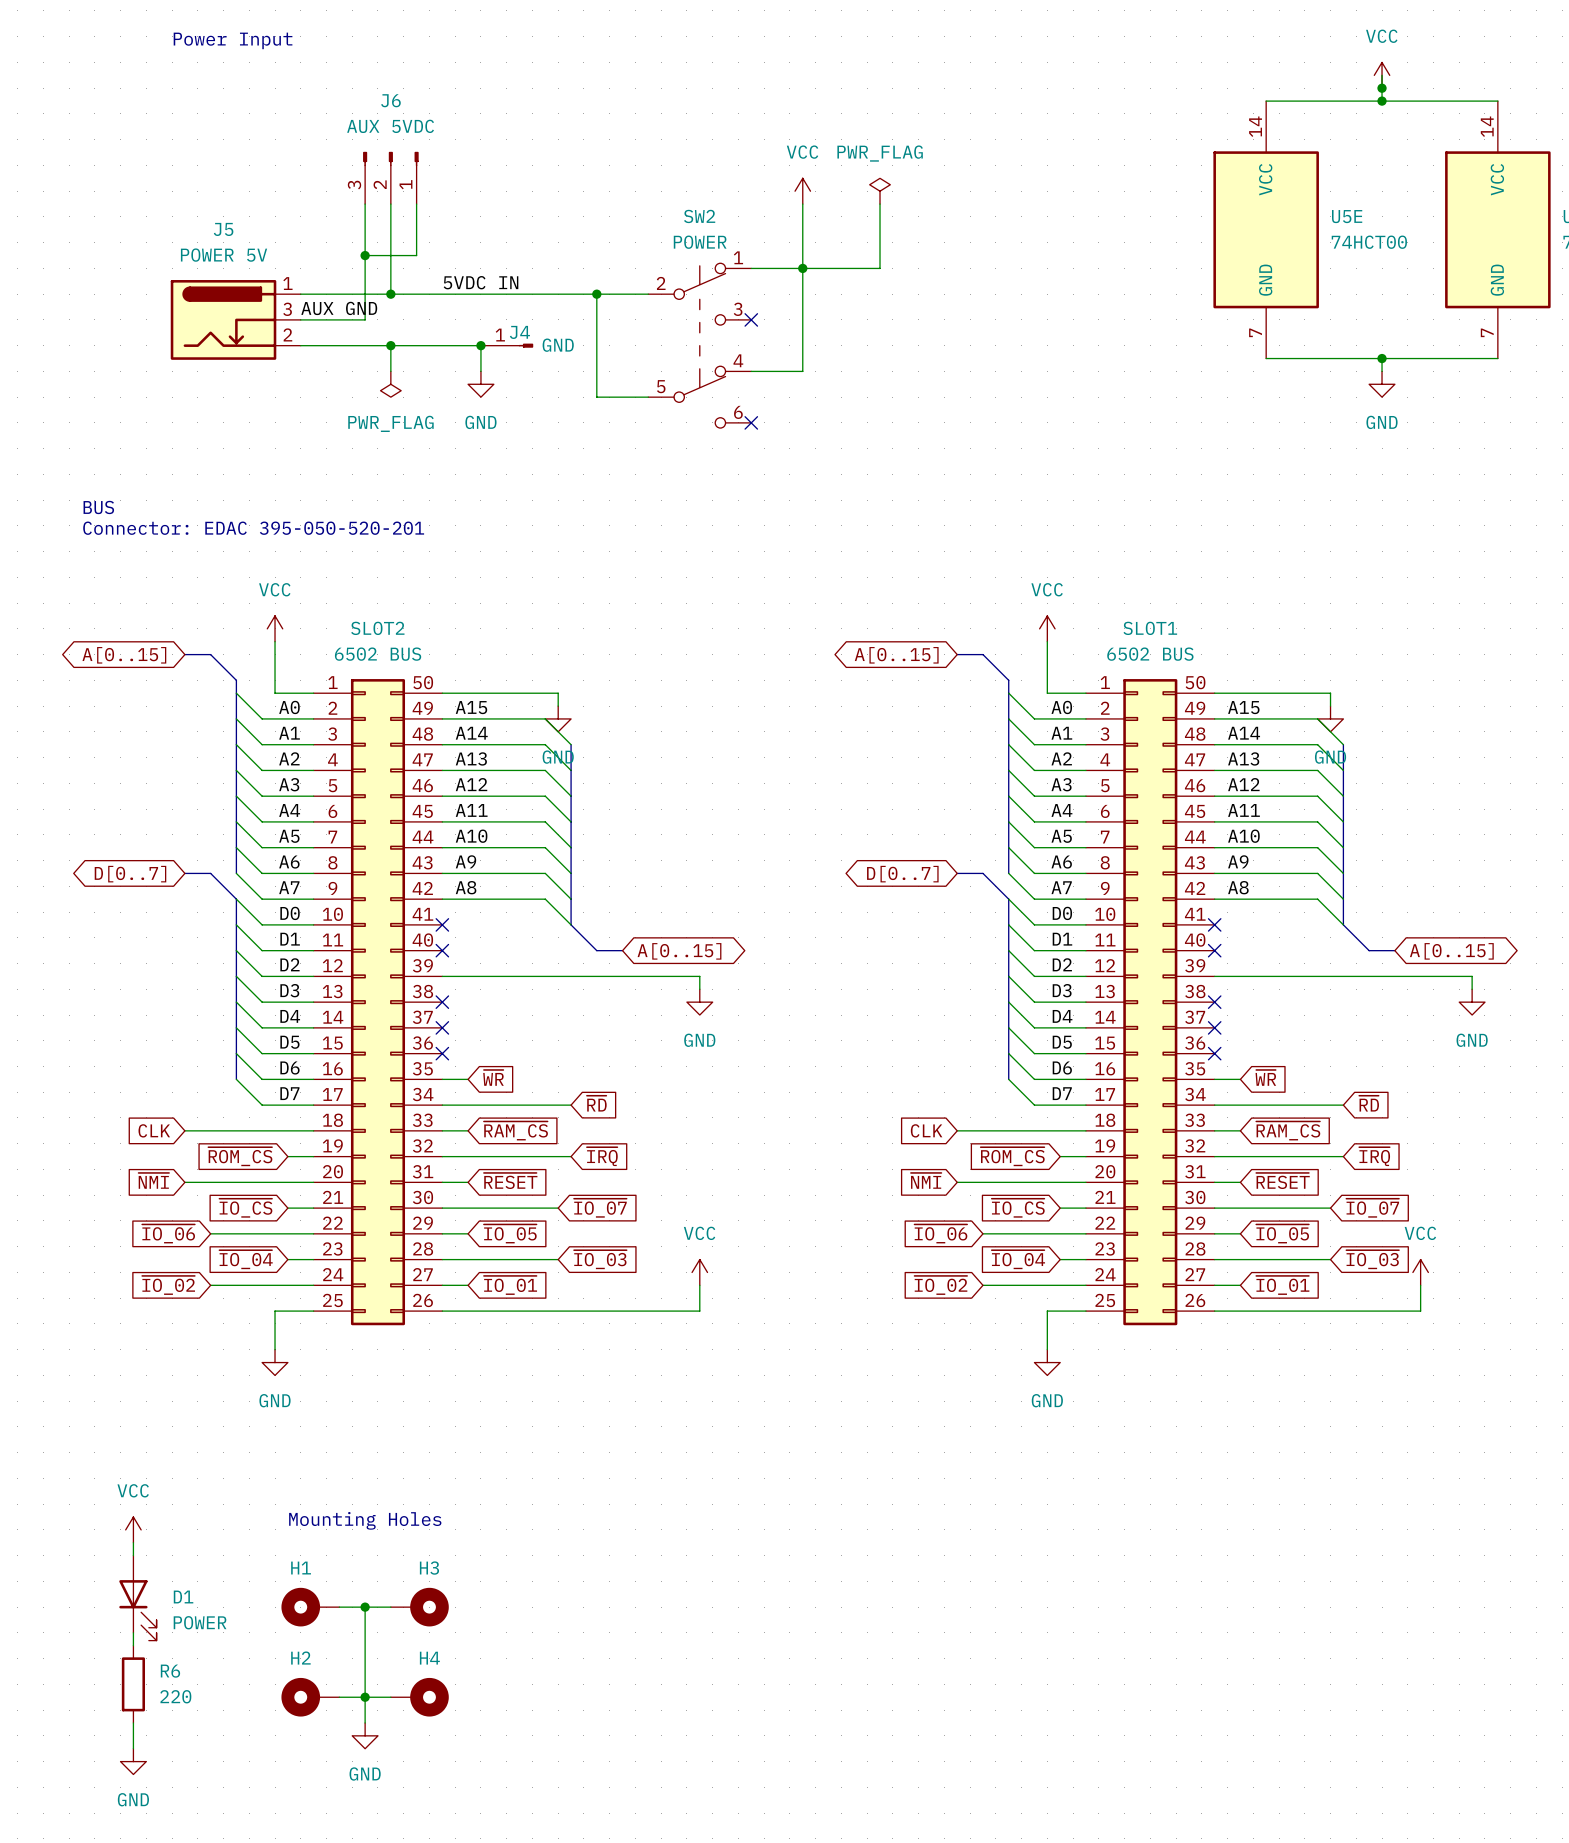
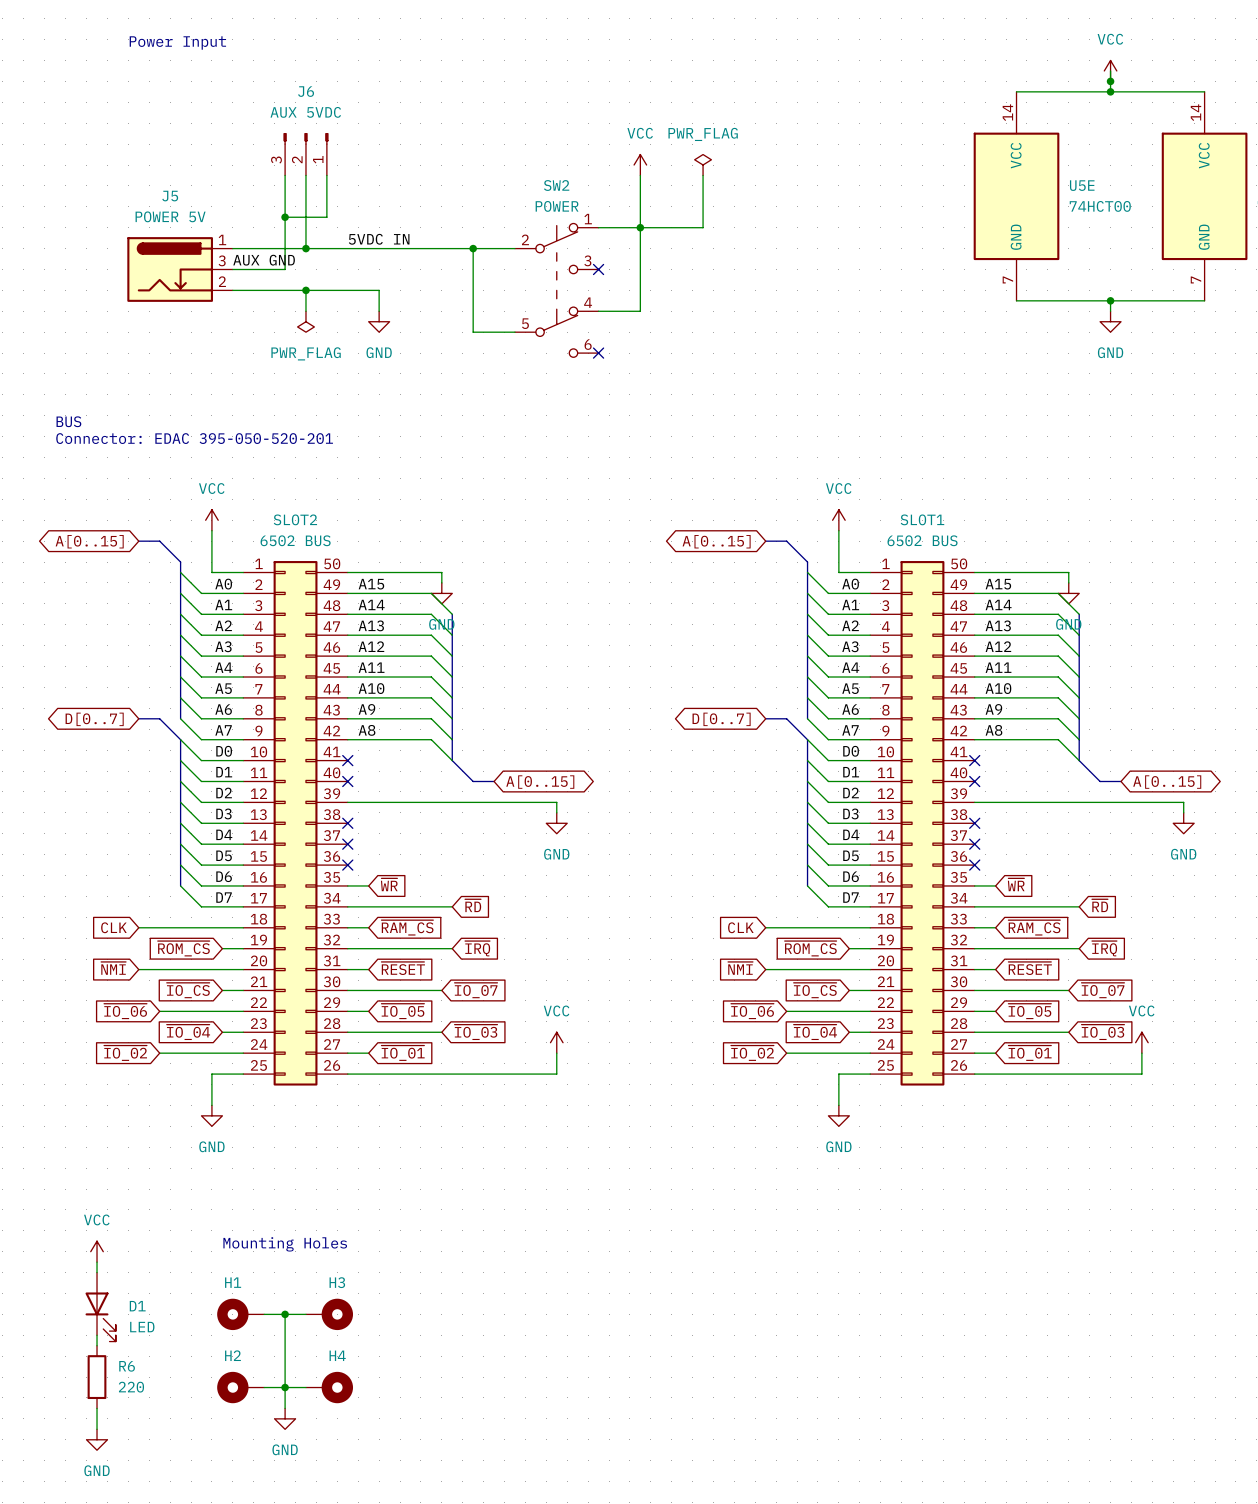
junction: (480, 345) -> none
J4: GND (507, 345) -> none
D1 value: POWER (200, 1622) -> LED (142, 1327)

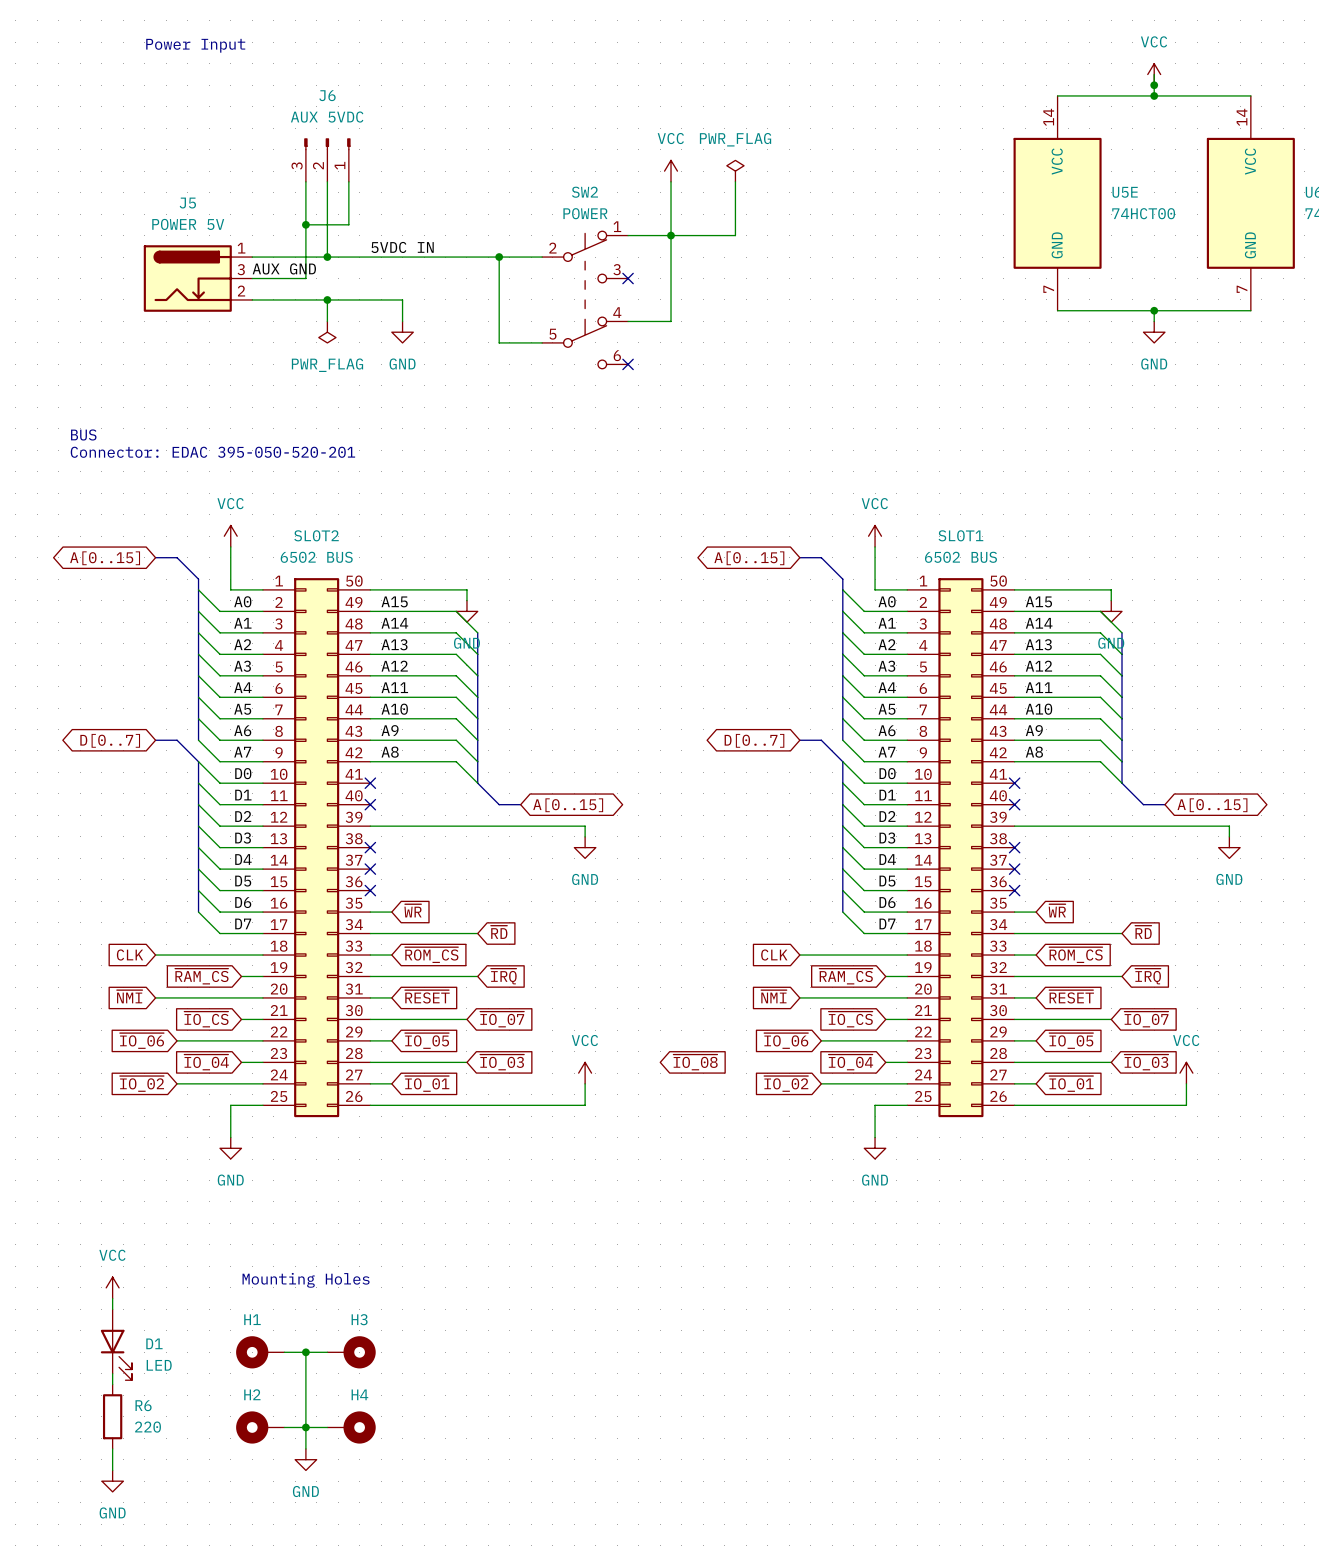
global label: ~{RAM_CS} (407, 927) -> ~{ROM_CS} (431, 955)
global label: ~{RAM_CS} (1034, 927) -> ~{ROM_CS} (1075, 955)
global label: ~{ROM_CS} (183, 948) -> ~{RAM_CS} (201, 976)
global label: ~{ROM_CS} (810, 948) -> ~{RAM_CS} (846, 976)
global label: none -> ~{IO_08} (695, 1062)

